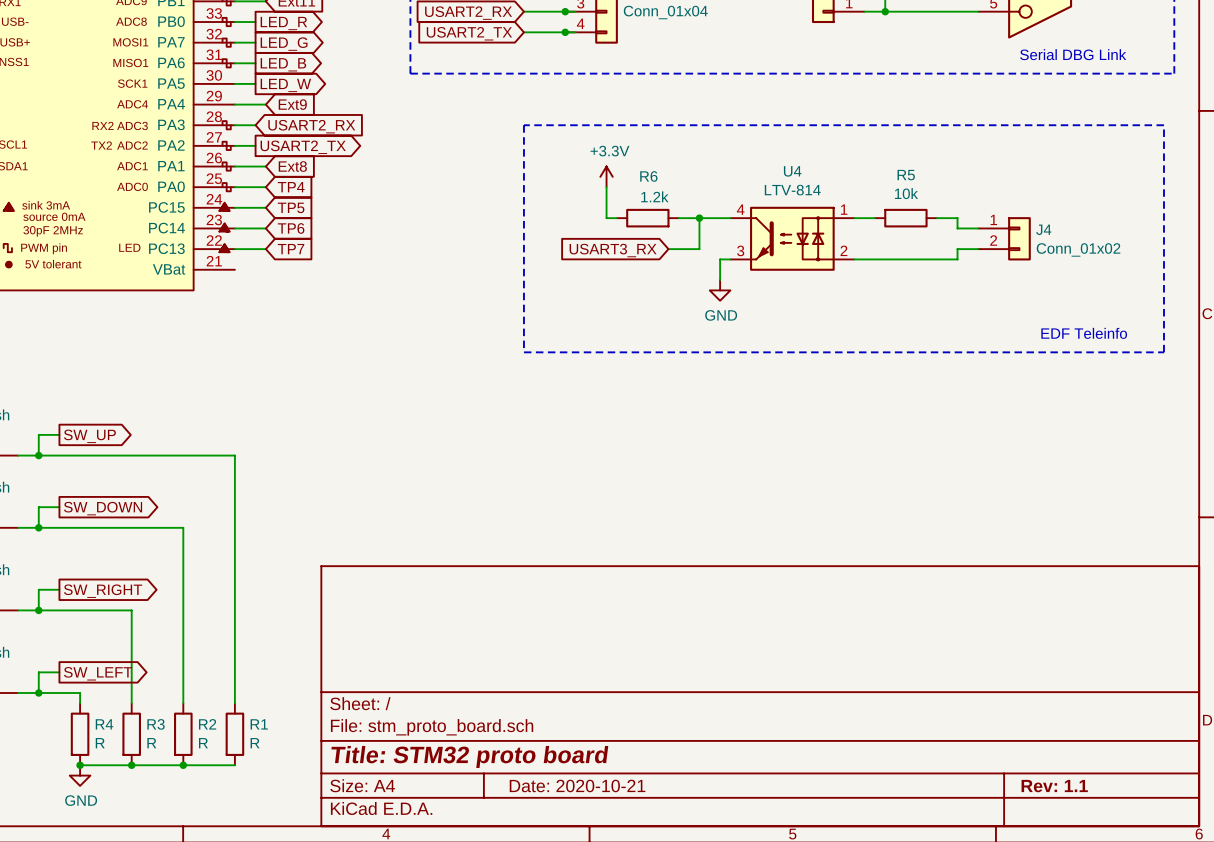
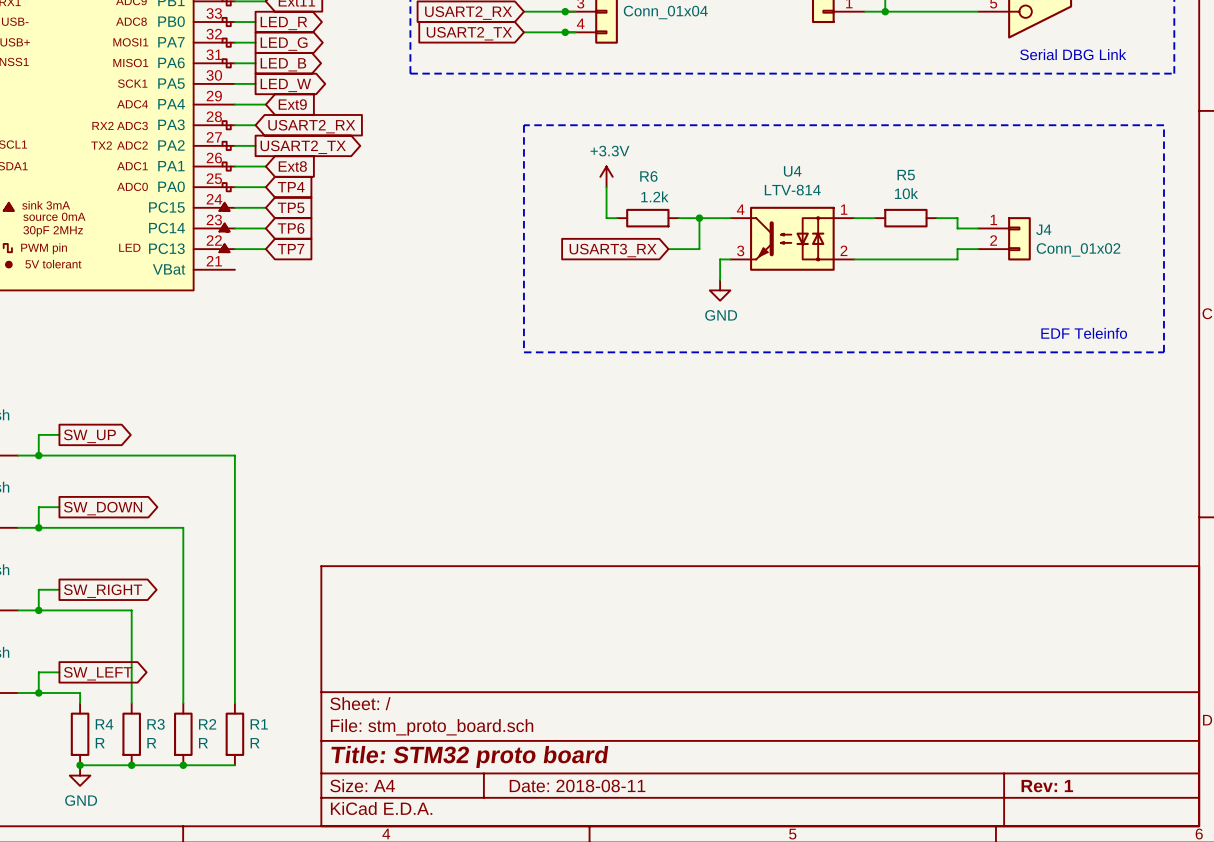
title block: Date: 2020-10-21 (577, 785) -> Date: 2018-08-11 (577, 785)
title block: Rev: 1.1 (1054, 786) -> Rev: 1 (1047, 786)

